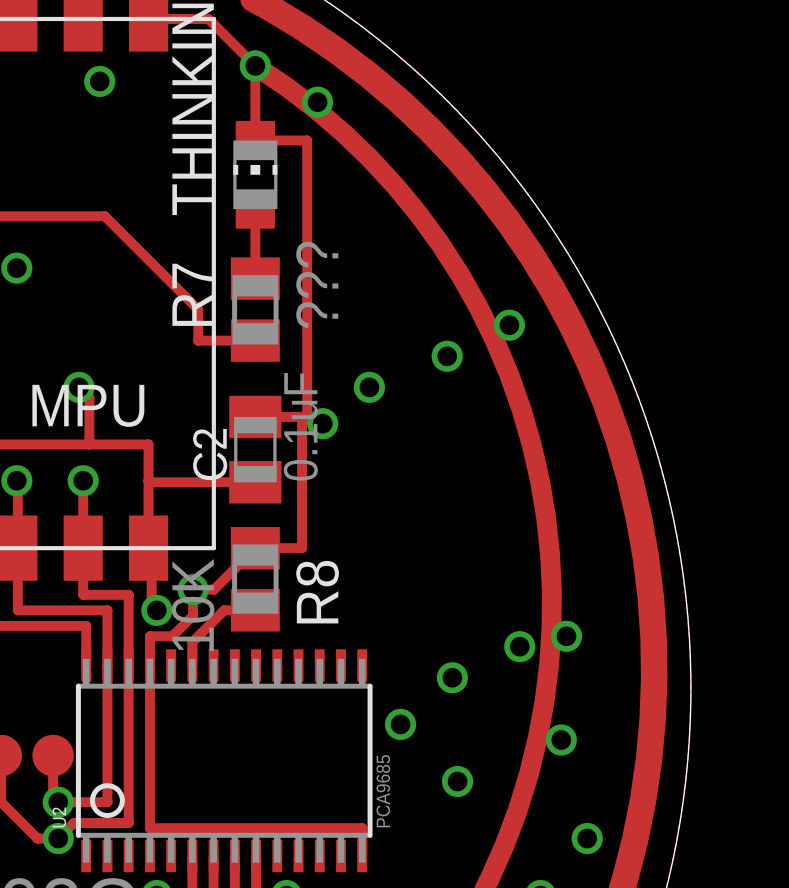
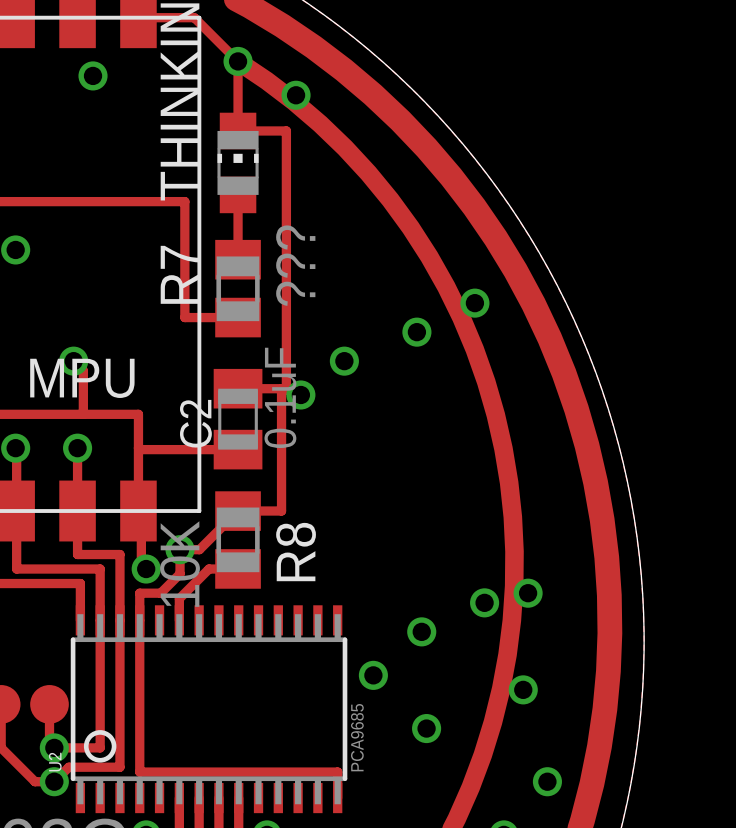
track: (104, 216) (198, 309) -> (97, 201) (184, 201) (184, 288)

